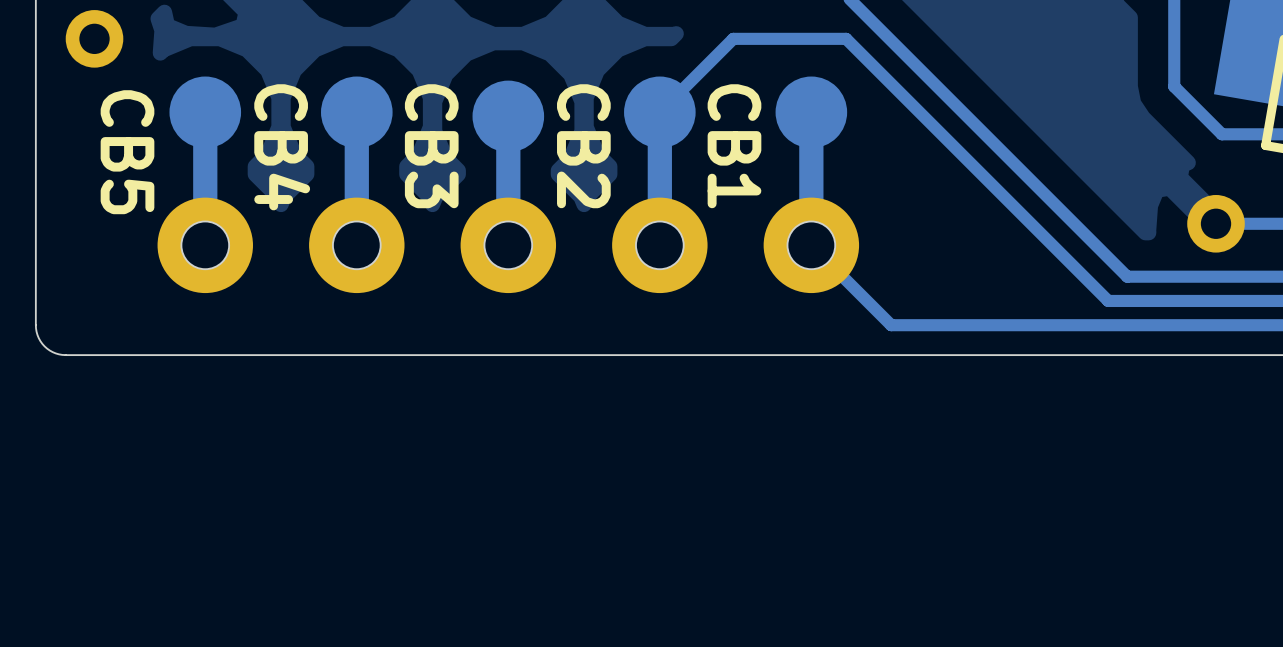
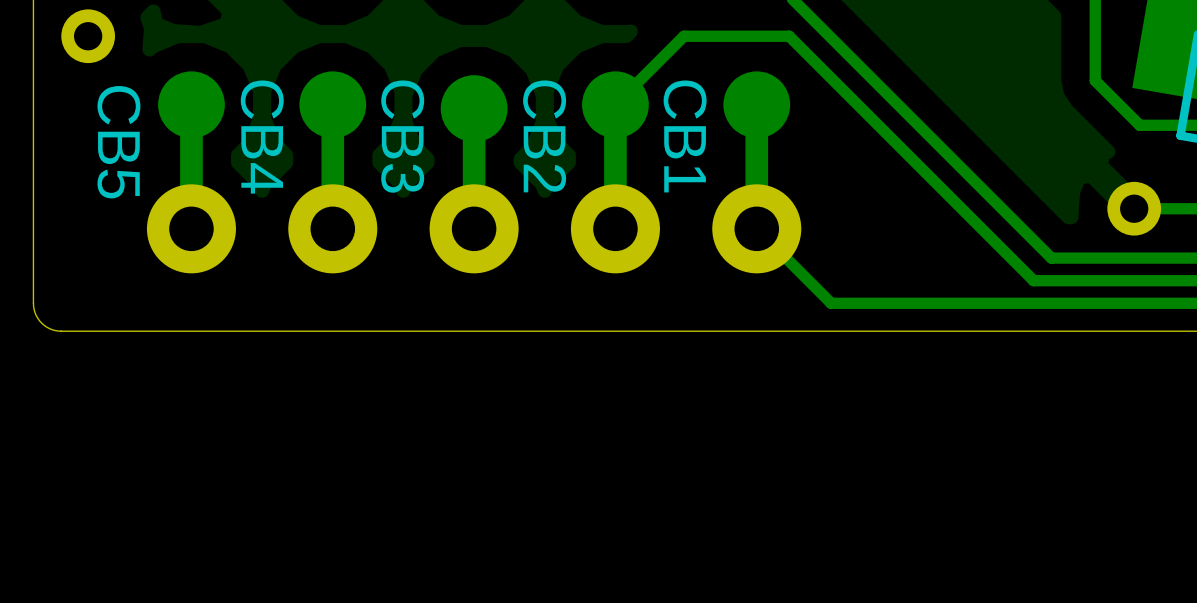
round board edge: [181, 221, 230, 270] -> none
round board edge: [332, 221, 381, 270] -> none
round board edge: [484, 221, 533, 270] -> none
round board edge: [635, 221, 685, 270] -> none
round board edge: [787, 221, 836, 270] -> none

